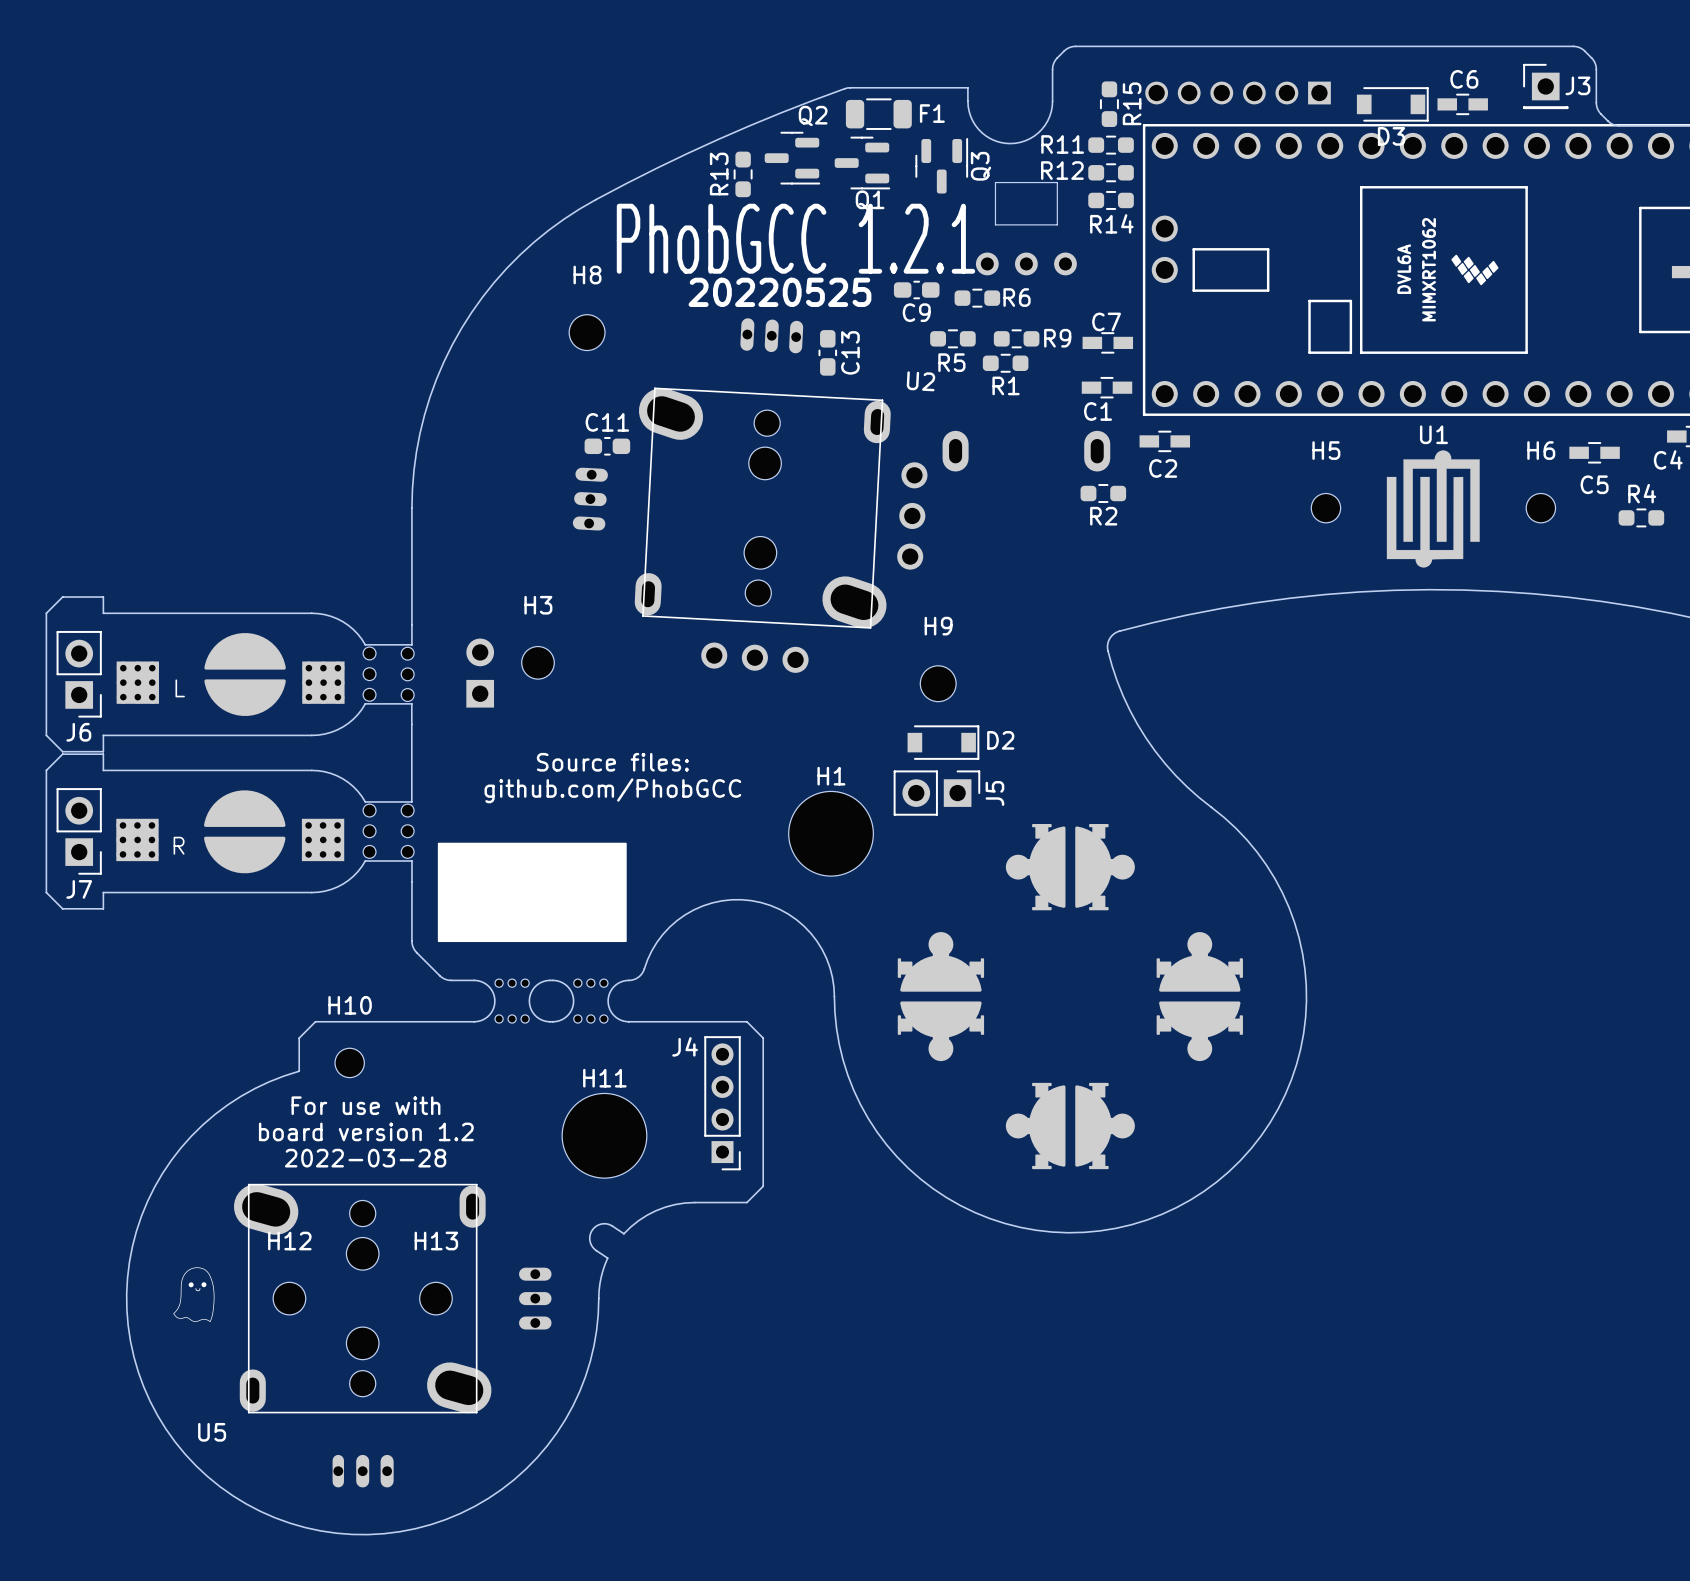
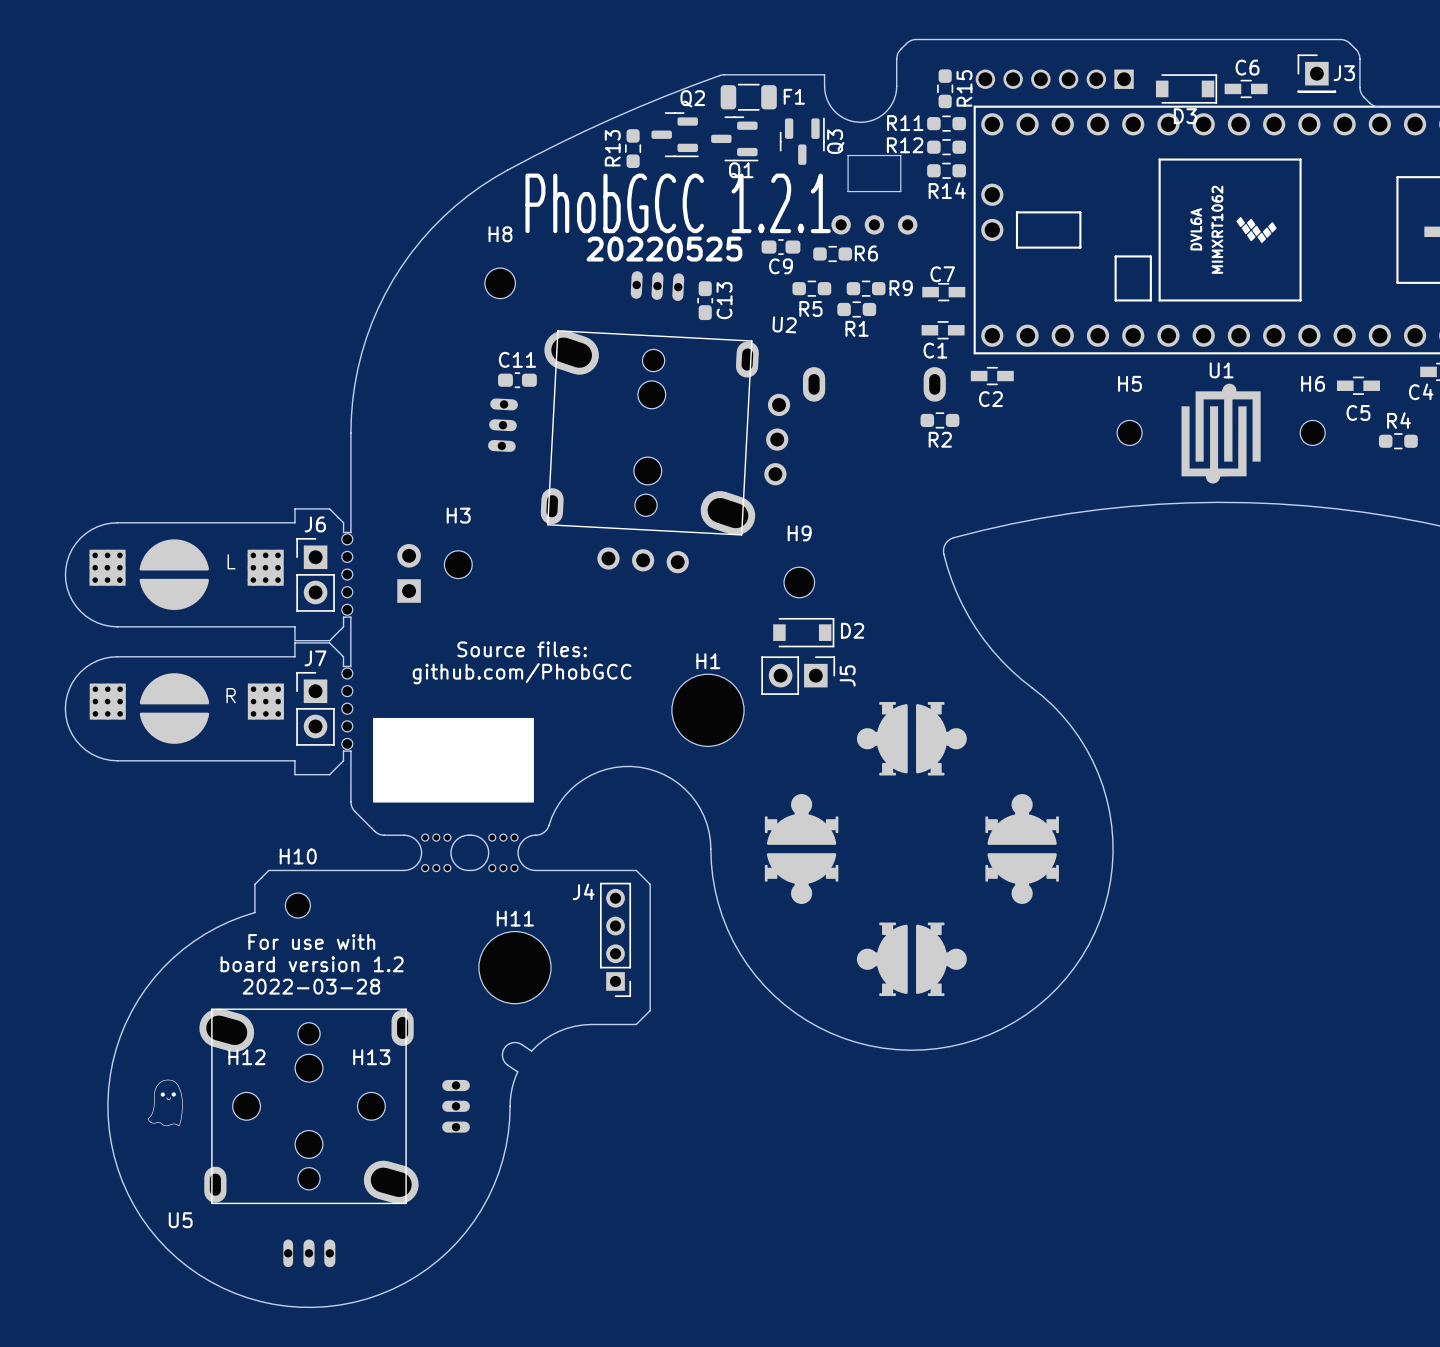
board edge: (411, 625) (411, 644) (365, 644) (353, 629) (342, 621) (318, 613) (103, 613) (103, 597) (62, 597) (46, 613) (46, 735) (62, 751) (103, 751) (103, 735) (324, 734) (348, 723) (365, 703) (411, 703) (411, 724) -> (350, 532) (343, 532) (343, 522) (329, 508) (294, 508) (294, 522) (110, 523) (91, 529) (76, 543) (69, 554) (65, 574) (69, 594) (76, 606) (91, 619) (110, 626) (294, 626) (294, 640) (329, 640) (343, 626) (343, 617) (350, 617)
part footprint: [401, 647, 415, 702] -> [341, 533, 353, 616]
J6 rotation: 0° (79, 674) -> 180° (315, 574)
J6 position: (79, 674) -> (315, 574)
part rotation: 0° (230, 674) -> 180° (186, 574)
part: (369, 674) -> none
board edge: (411, 782) (411, 801) (365, 801) (348, 782) (324, 771) (103, 770) (103, 754) (62, 754) (46, 770) (46, 892) (62, 908) (103, 908) (103, 892) (318, 892) (342, 884) (357, 871) (365, 861) (411, 861) (411, 881) -> (350, 666) (343, 666) (343, 656) (329, 642) (294, 642) (294, 656) (110, 657) (91, 663) (80, 672) (69, 688) (65, 708) (69, 728) (80, 745) (91, 753) (110, 760) (294, 760) (294, 774) (329, 774) (343, 760) (343, 751) (350, 751)
part footprint: [401, 804, 415, 859] -> [341, 668, 353, 750]
J7 rotation: 0° (79, 831) -> 180° (315, 708)
J7 position: (79, 831) -> (315, 708)
part rotation: 0° (230, 831) -> 180° (186, 708)
part: (369, 831) -> none

